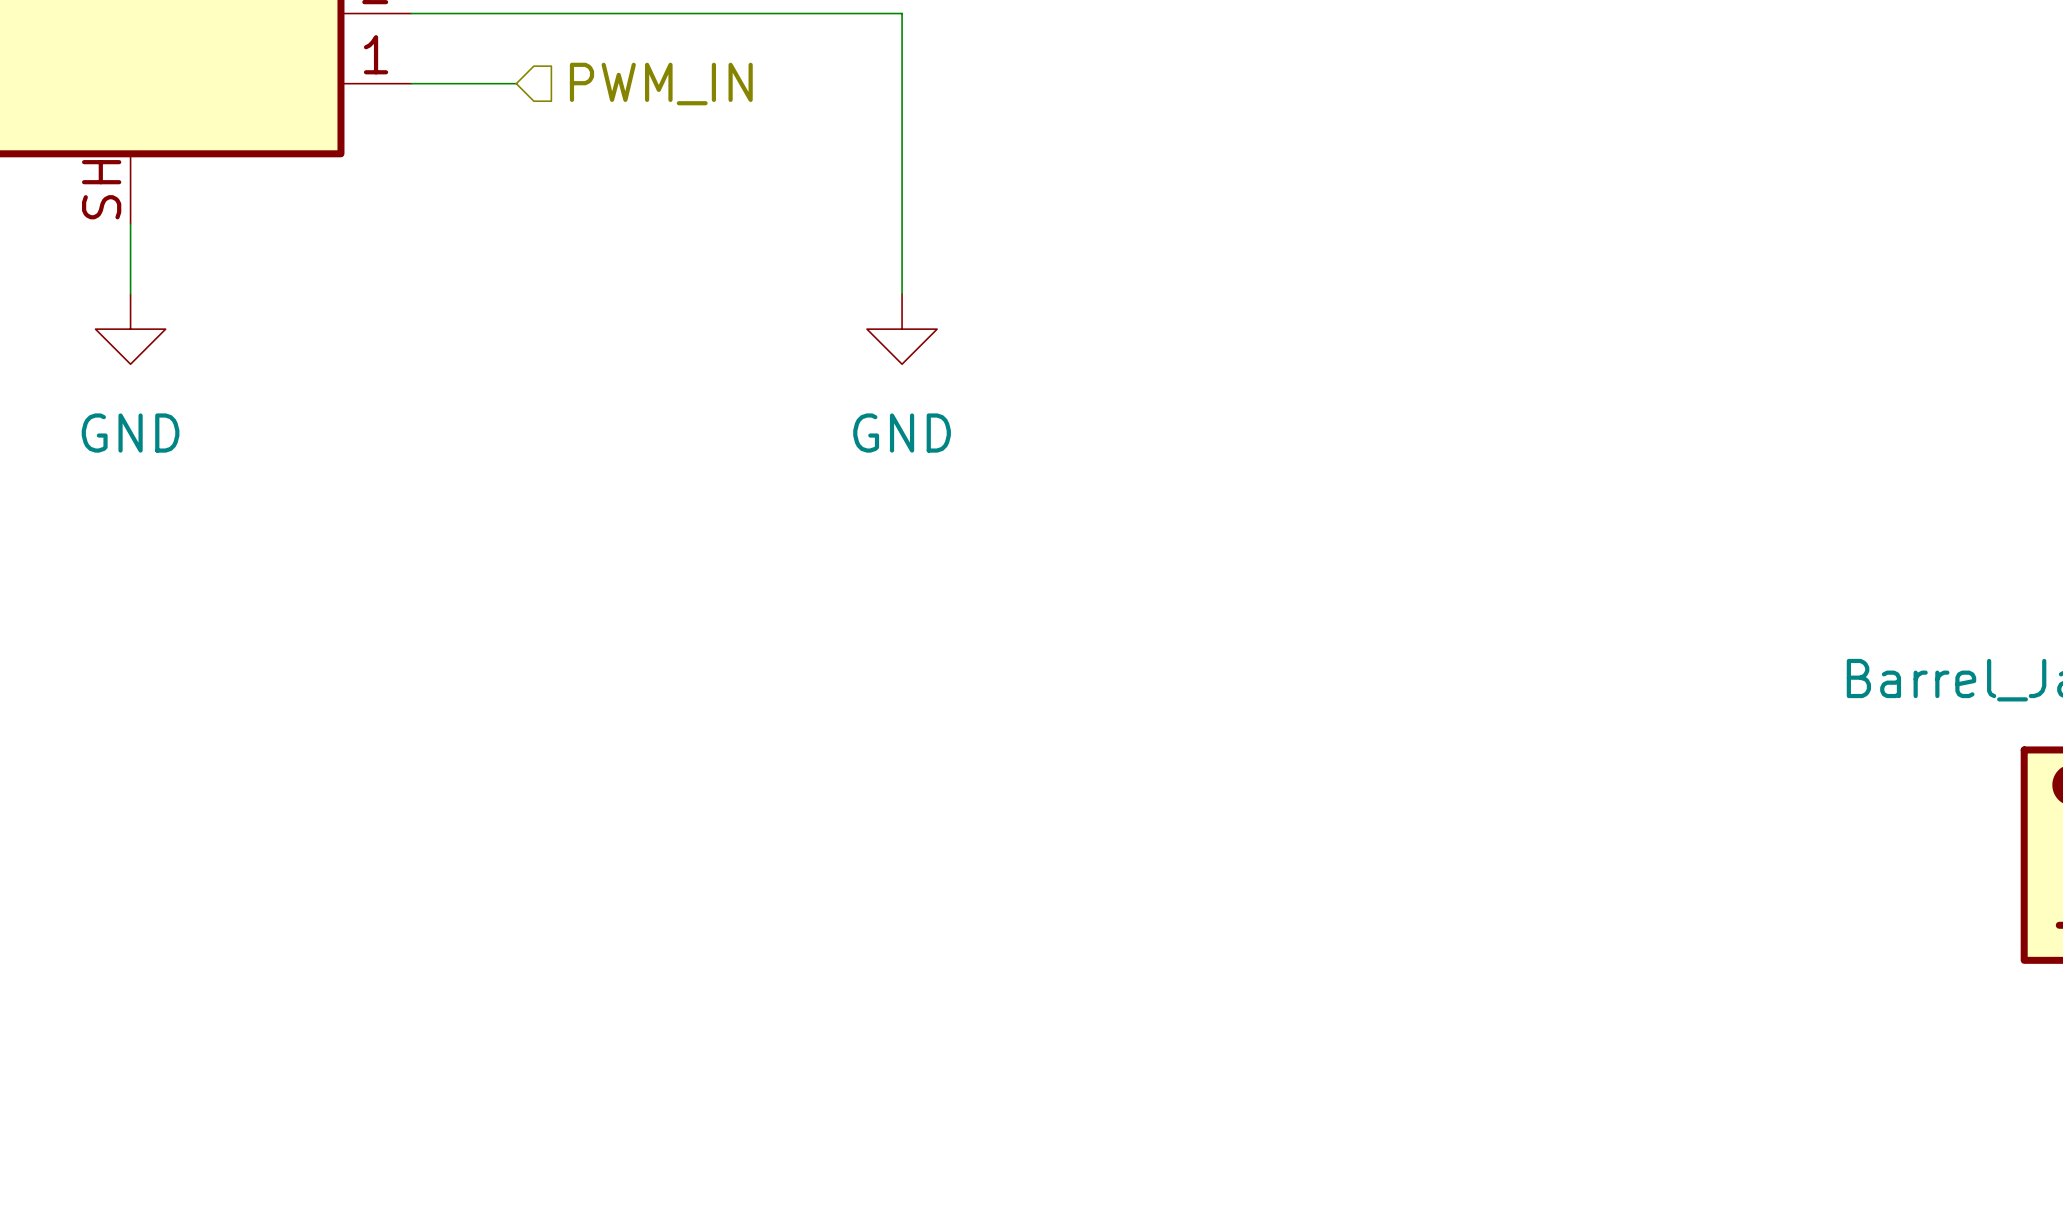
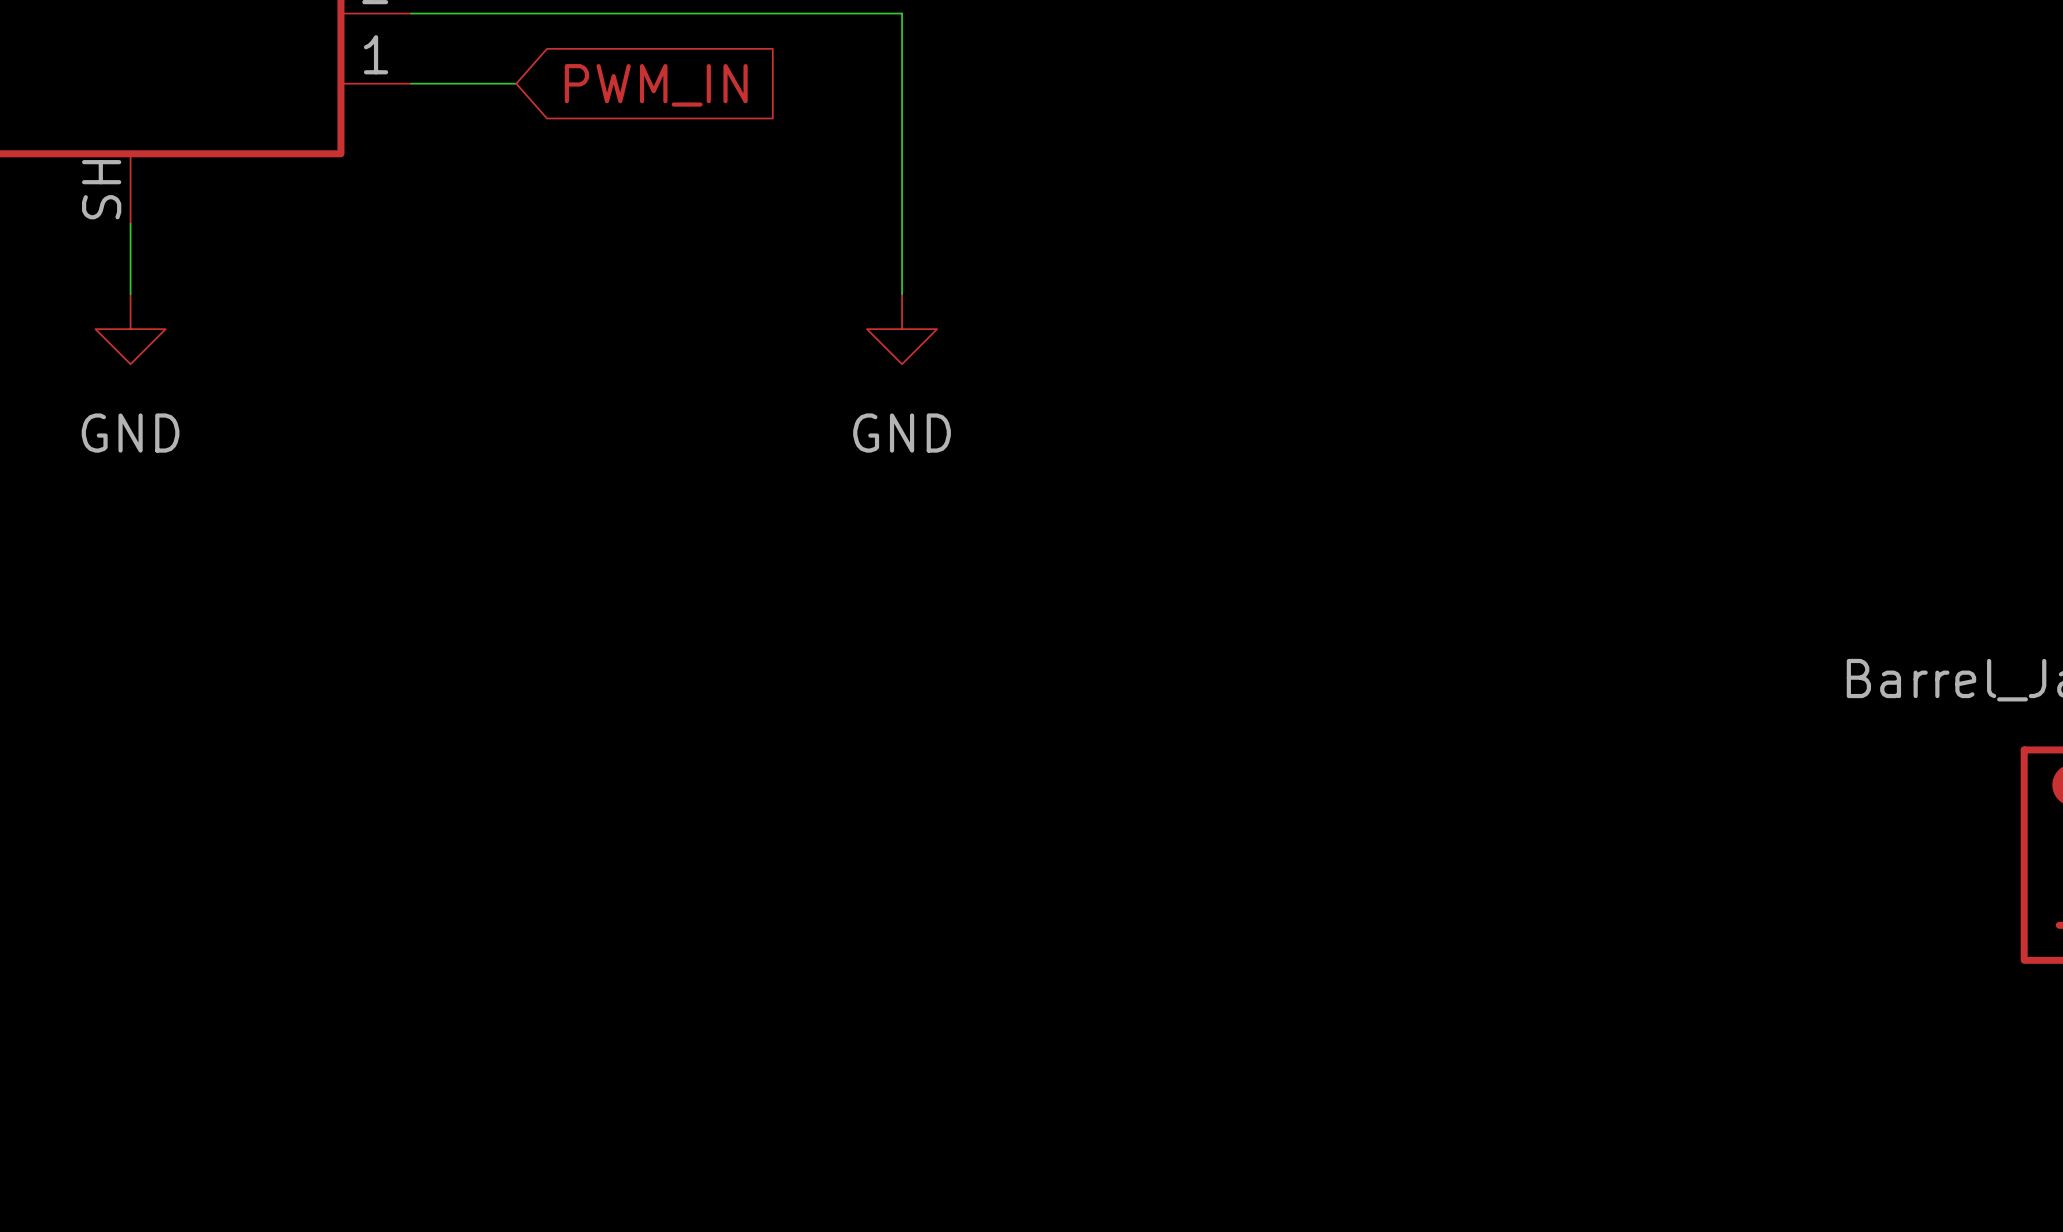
hierarchical label: PWM_IN (661, 84) -> none
global label: none -> PWM_IN (656, 85)

